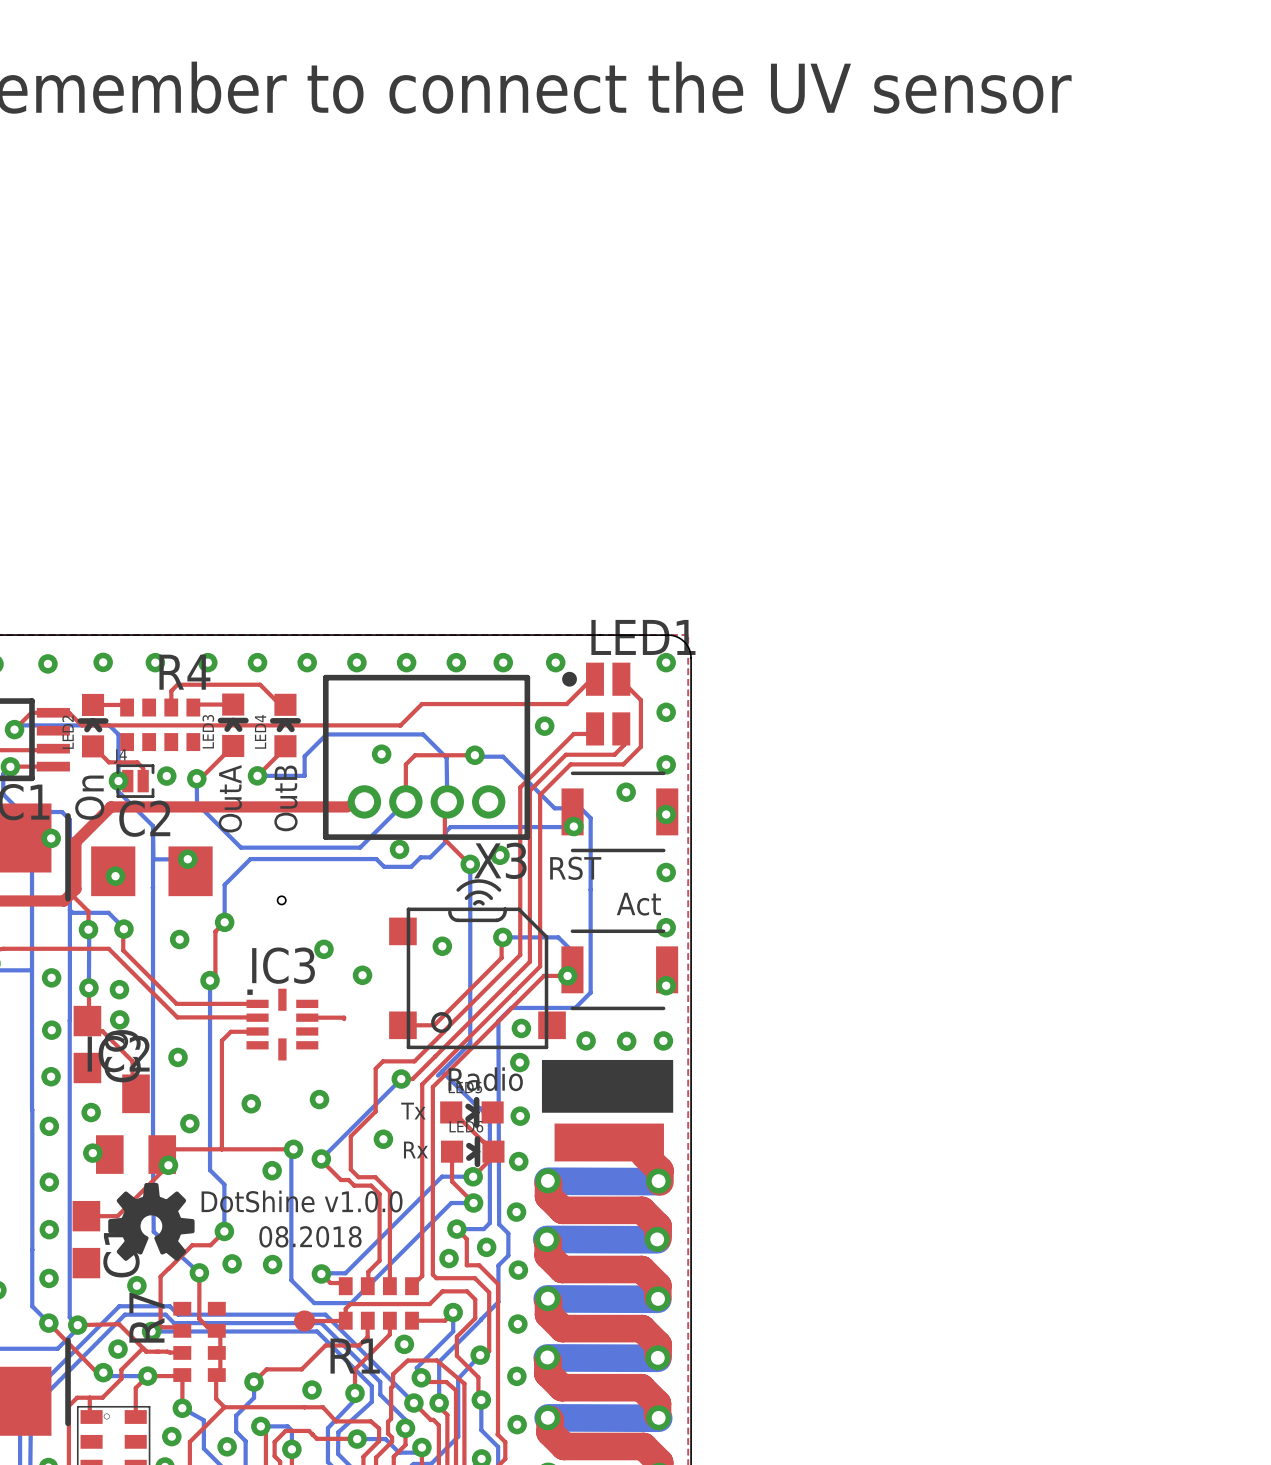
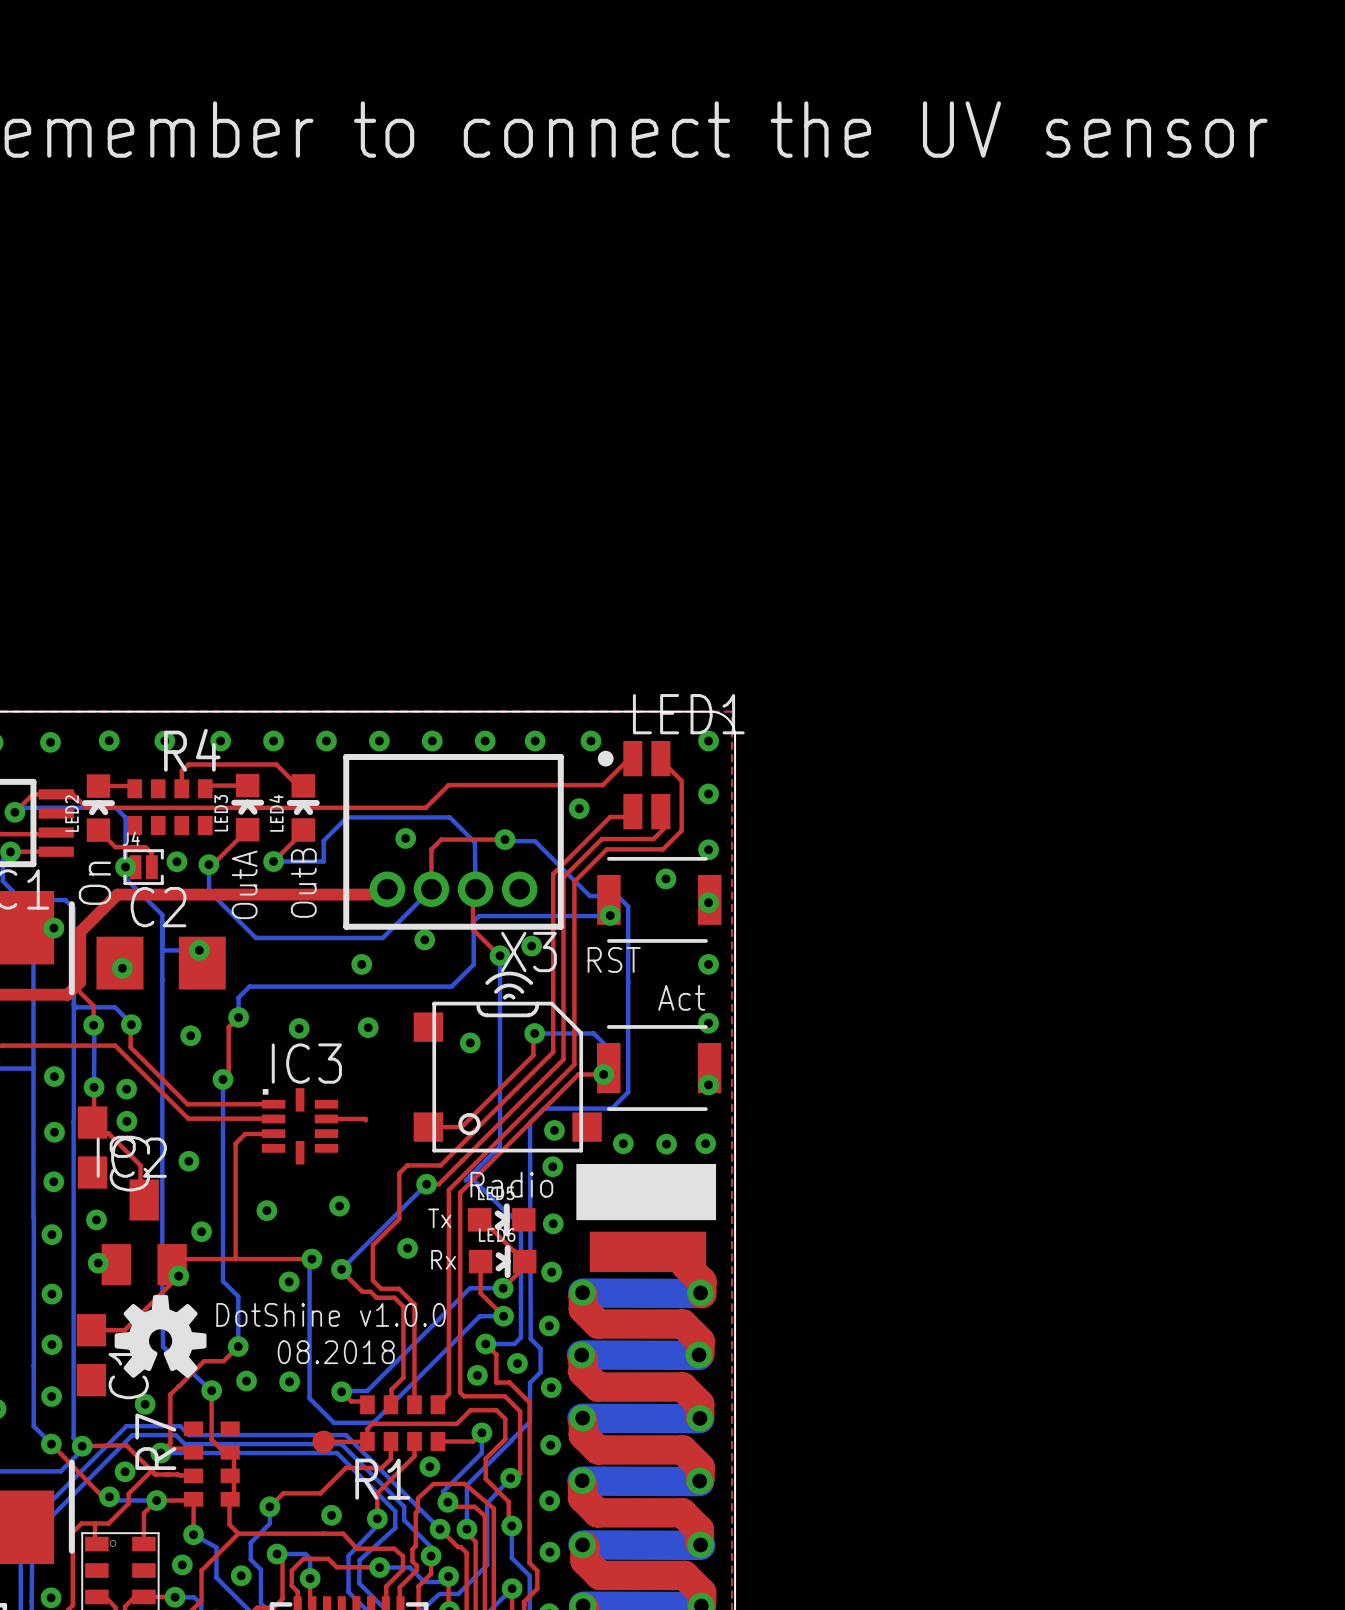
bottom track: (445, 842) (430, 857) (420, 857) (411, 866) (384, 866) (376, 859) (250, 859) (224, 884) (224, 903) -> (473, 932) (473, 964) (451, 986) (249, 986) (238, 997)
via: none -> (361, 964)
hole: (281, 900) -> none
via: none -> (368, 1027)
via: none -> (299, 1028)
via: (323, 949) -> none
via: (362, 975) -> none

